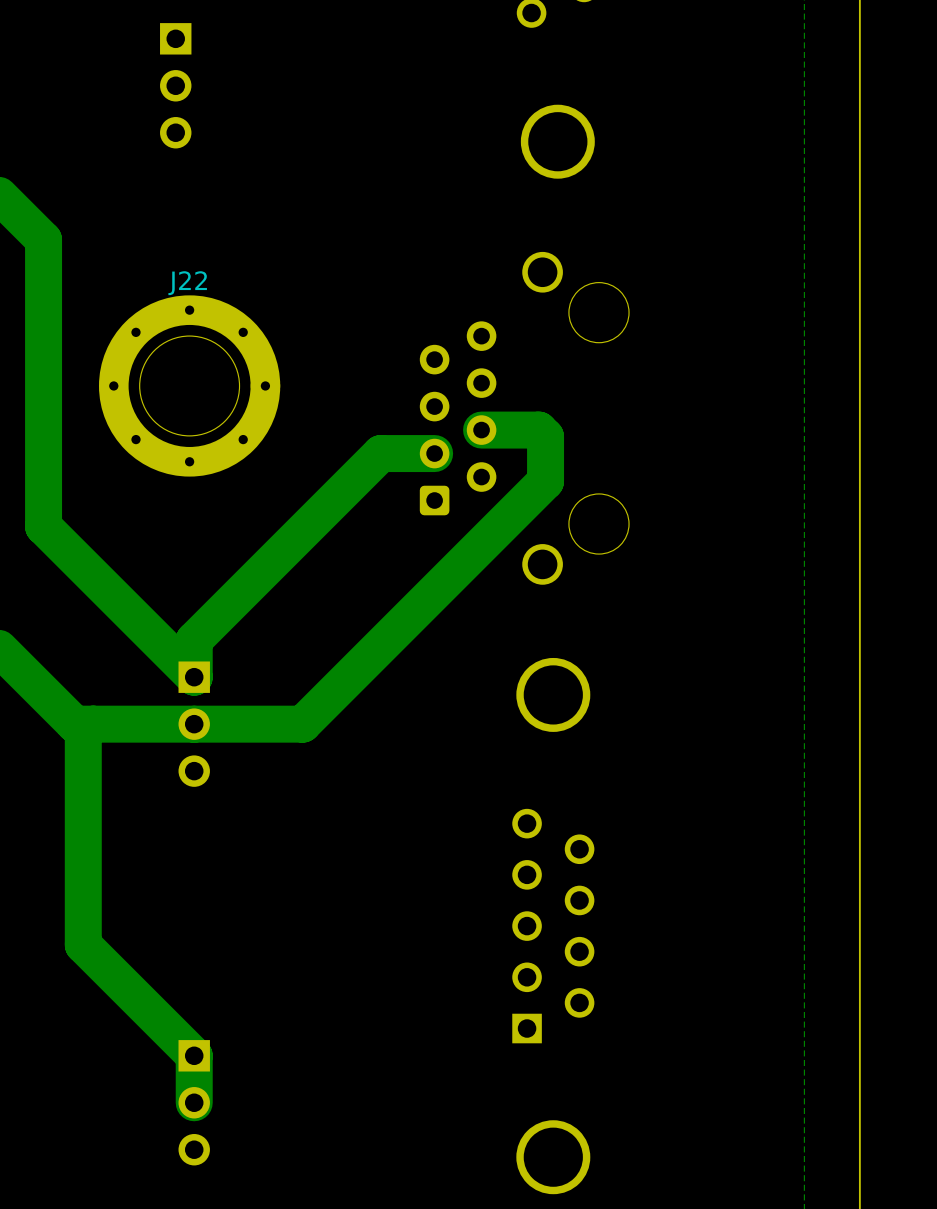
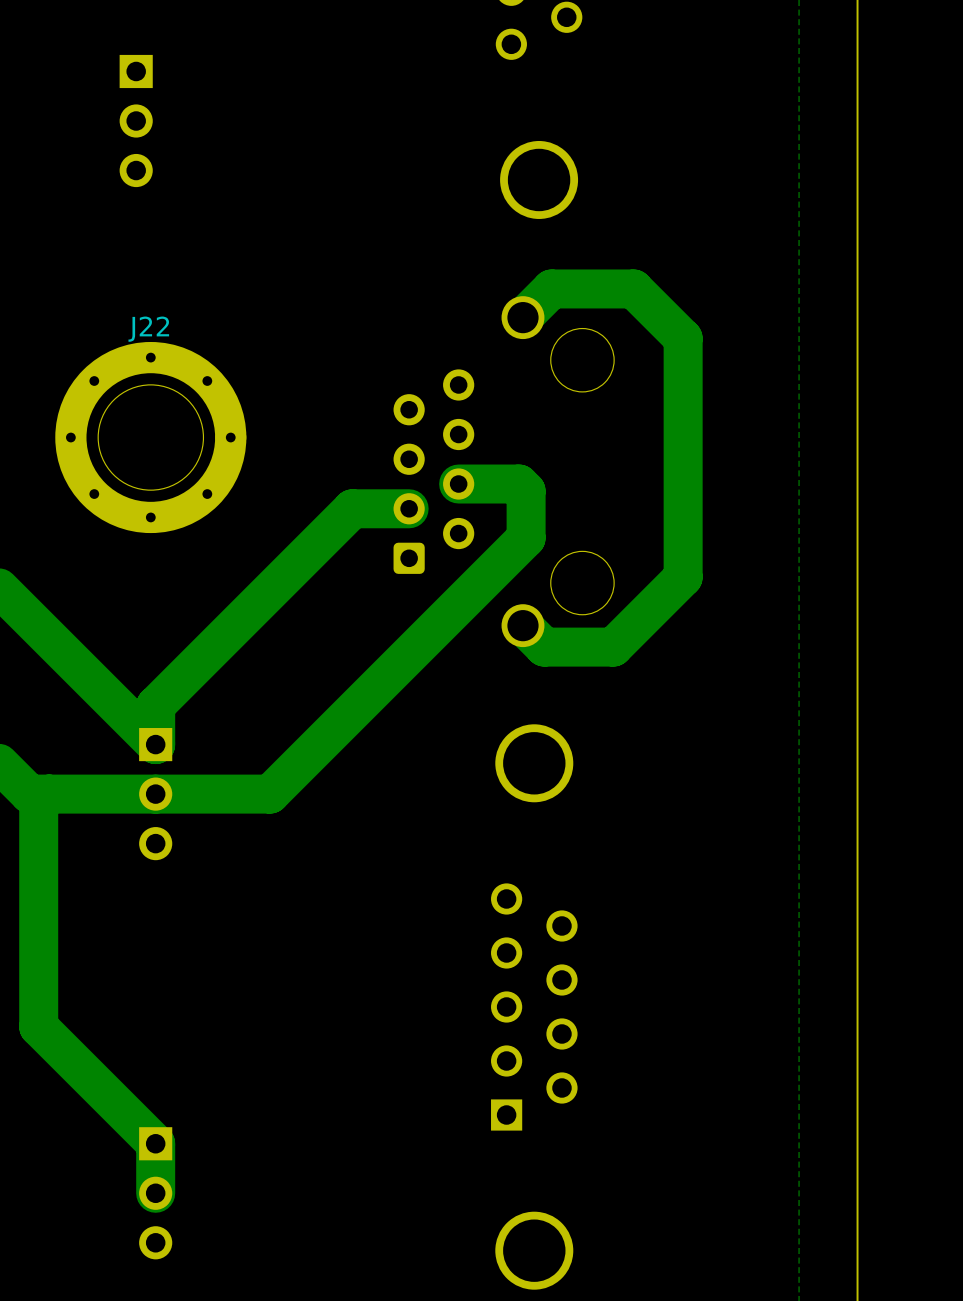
track: none -> (522, 317) (551, 288) (633, 288) (683, 338) (683, 577) (613, 647) (544, 647) (522, 625)

